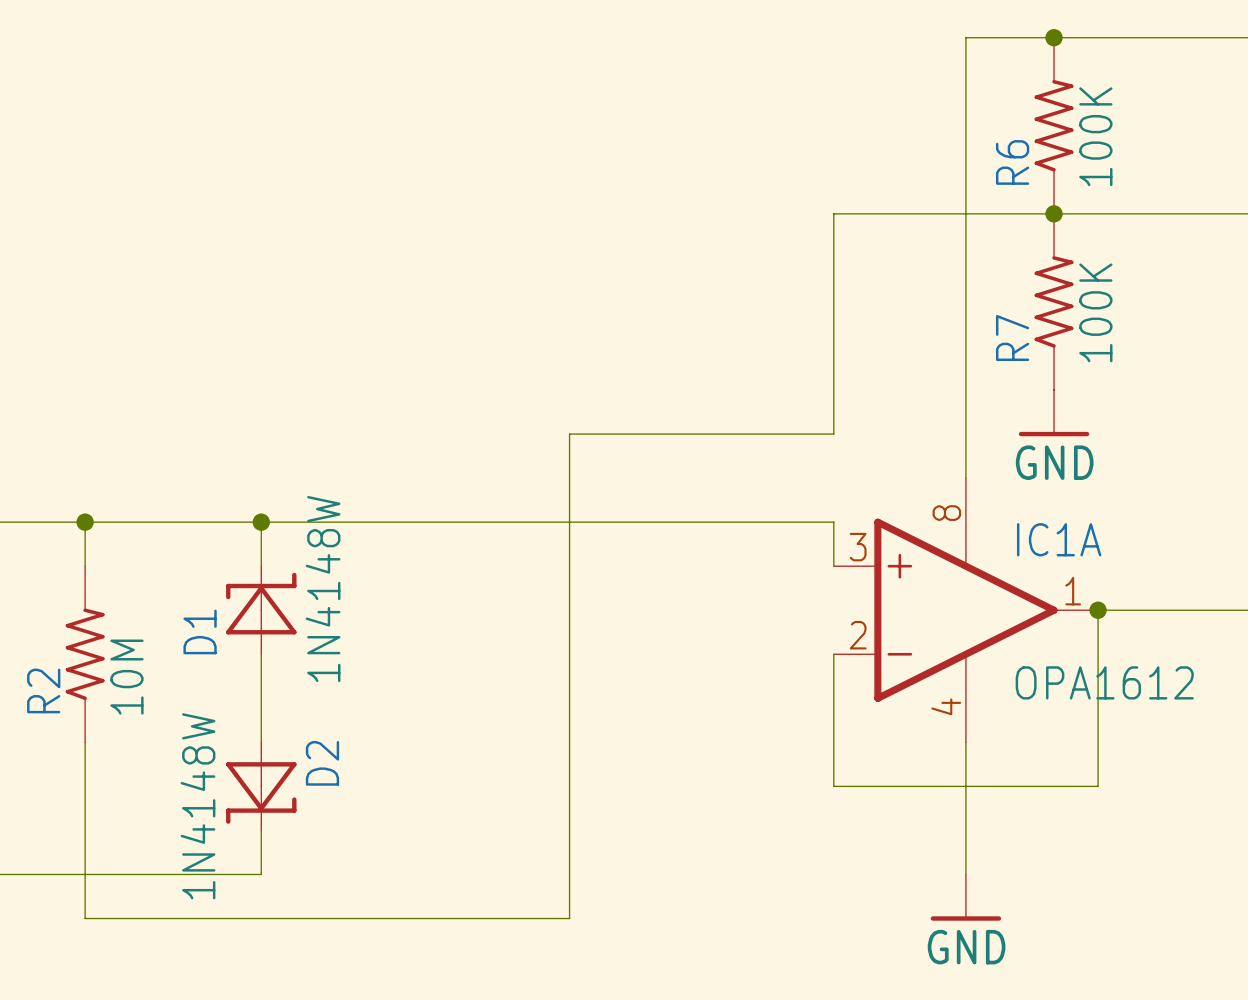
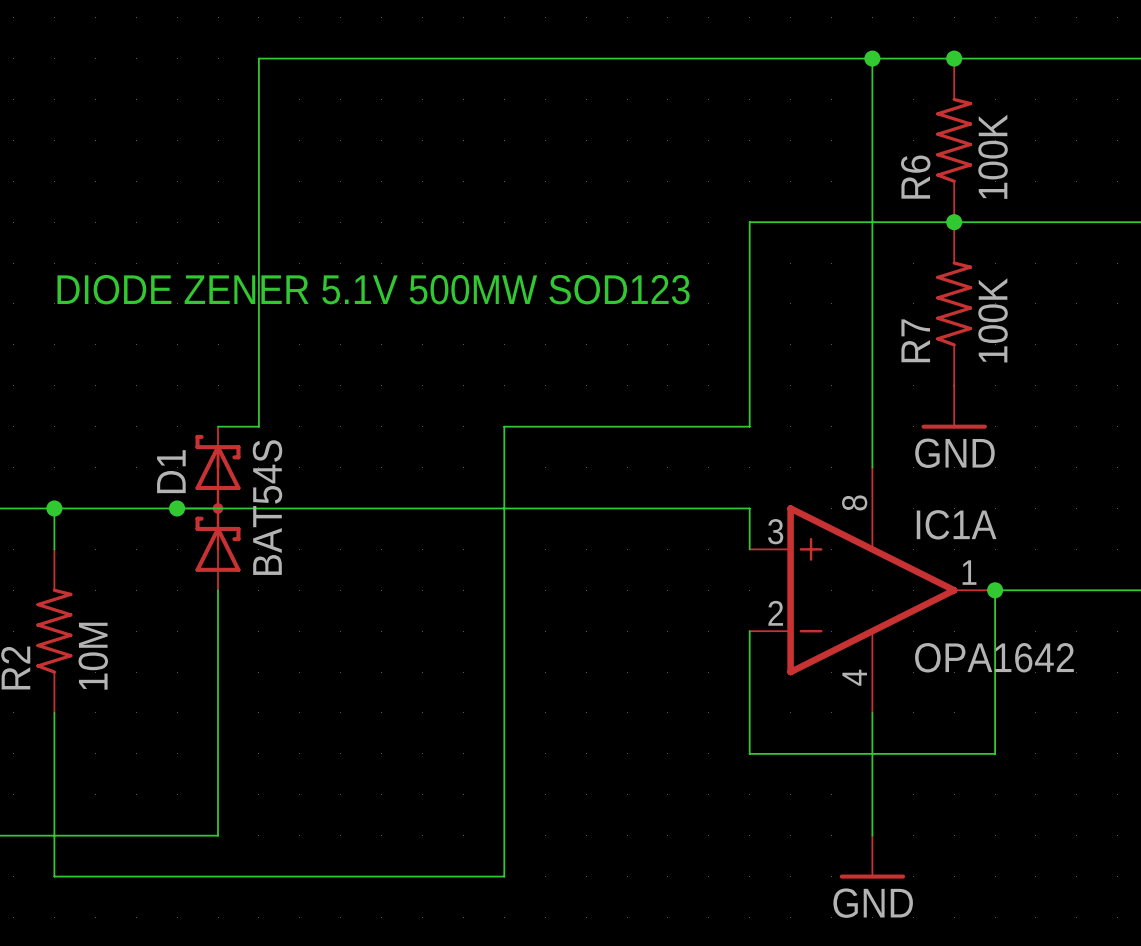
wire: none -> (872, 58) (258, 58) (258, 426) (218, 426)
junction: none -> (872, 58)
text: none -> DIODE ZENER 5.1V 500MW SOD123 (373, 289)
junction position: (261, 522) -> (177, 508)
D1 symbol: [226, 566, 297, 655] -> [177, 426, 241, 591]
D1 value: 1N4148W (323, 589) -> BAT54S (267, 507)
D1 name position: D1 (200, 631) -> D1 (171, 471)
IC1A value: OPA1612 (1104, 682) -> OPA1642 (994, 657)
D2: 1N4148W (261, 786) -> none

